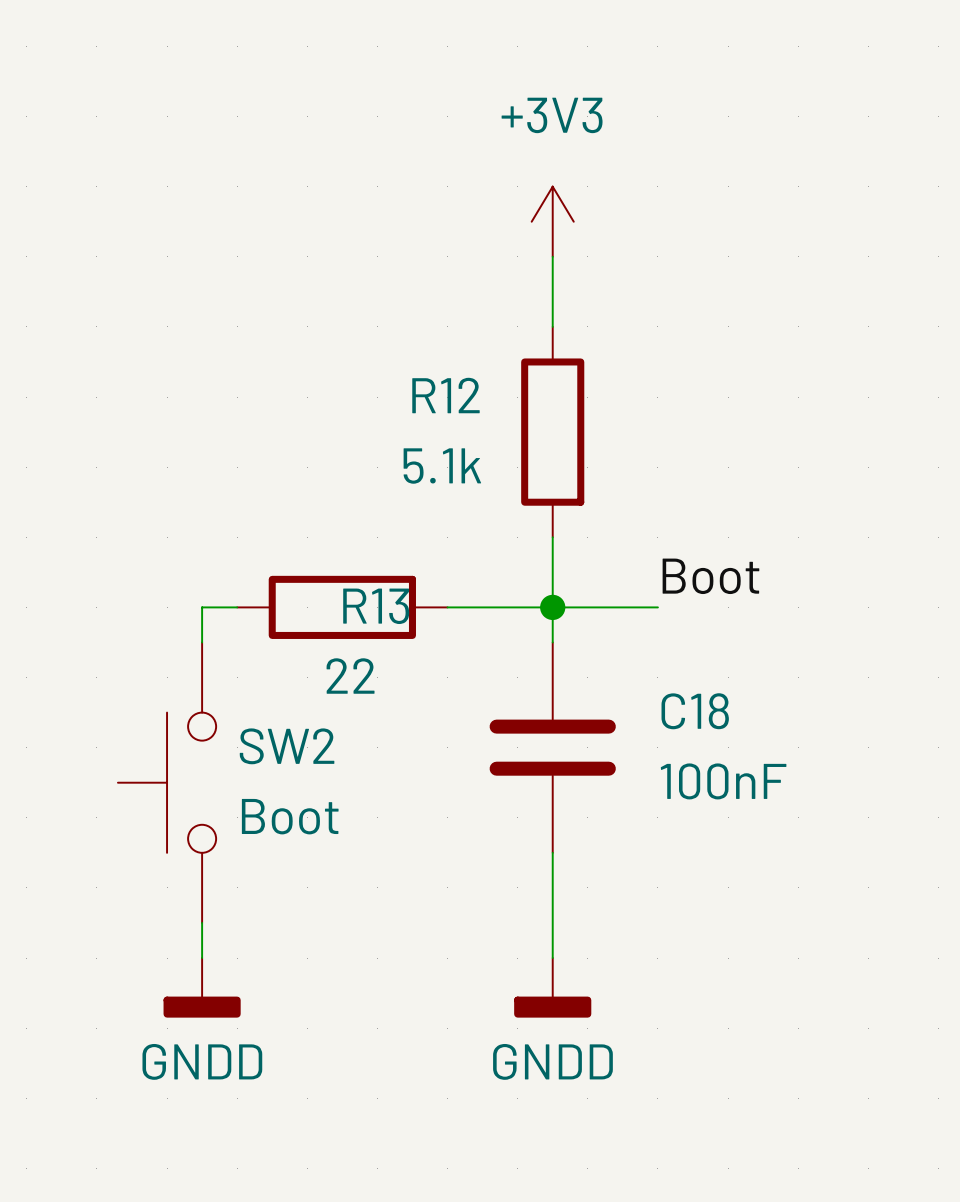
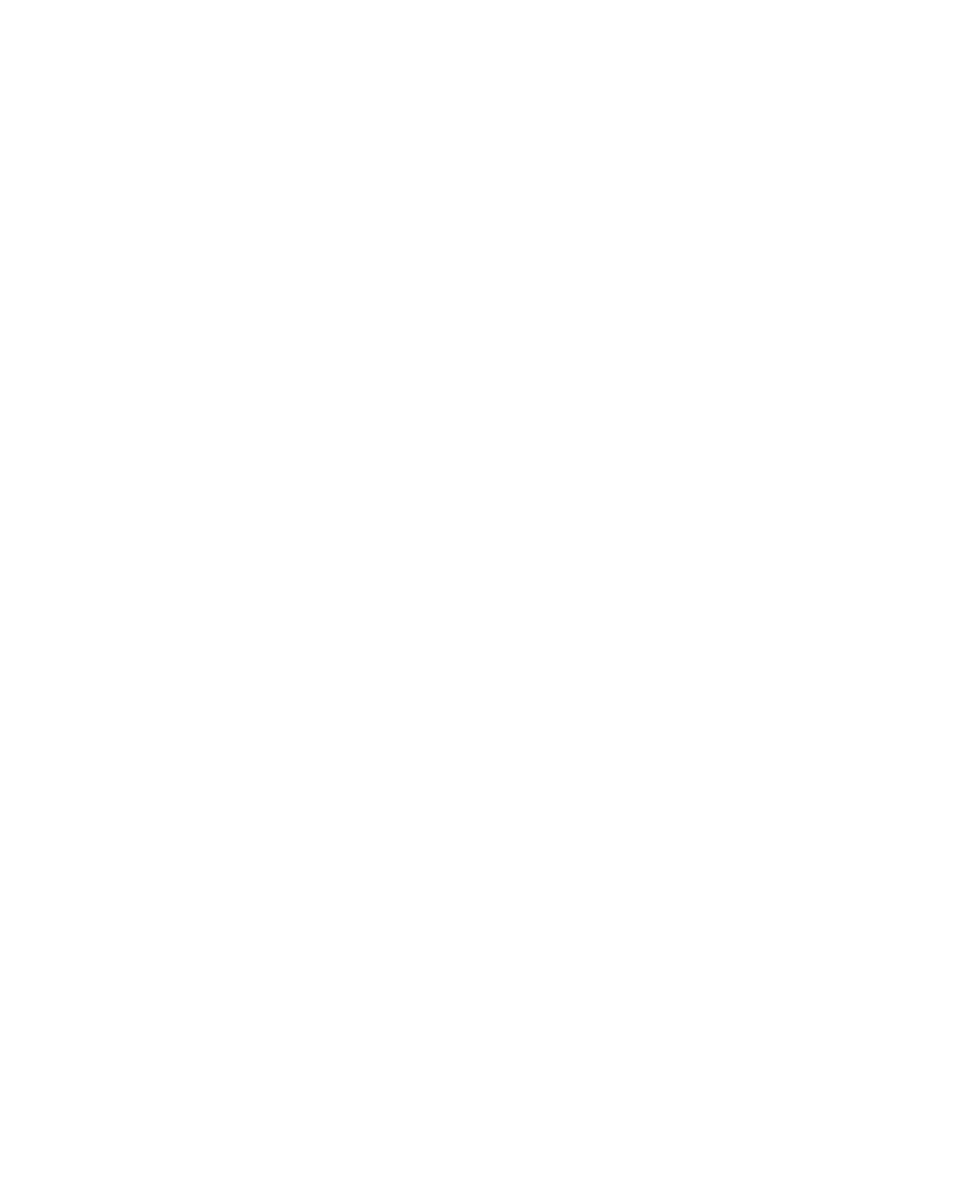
power symbol: +3V3 (552, 221) -> none
wire: (552, 256) (552, 326) -> none
R12: 5.1k (552, 432) -> none
wire: (552, 537) (552, 642) -> none
label: Boot (710, 576) -> none
wire: (237, 607) (202, 607) (202, 642) -> none
R13: 22 (342, 607) -> none
wire: (447, 607) (657, 607) -> none
junction: (552, 607) -> none
C18: 100nF (552, 747) -> none
SW2: Boot (167, 782) -> none
wire: (552, 852) (552, 958) -> none
wire: (202, 922) (202, 958) -> none
power symbol: GNDD (202, 987) -> none
power symbol: GNDD (552, 987) -> none

